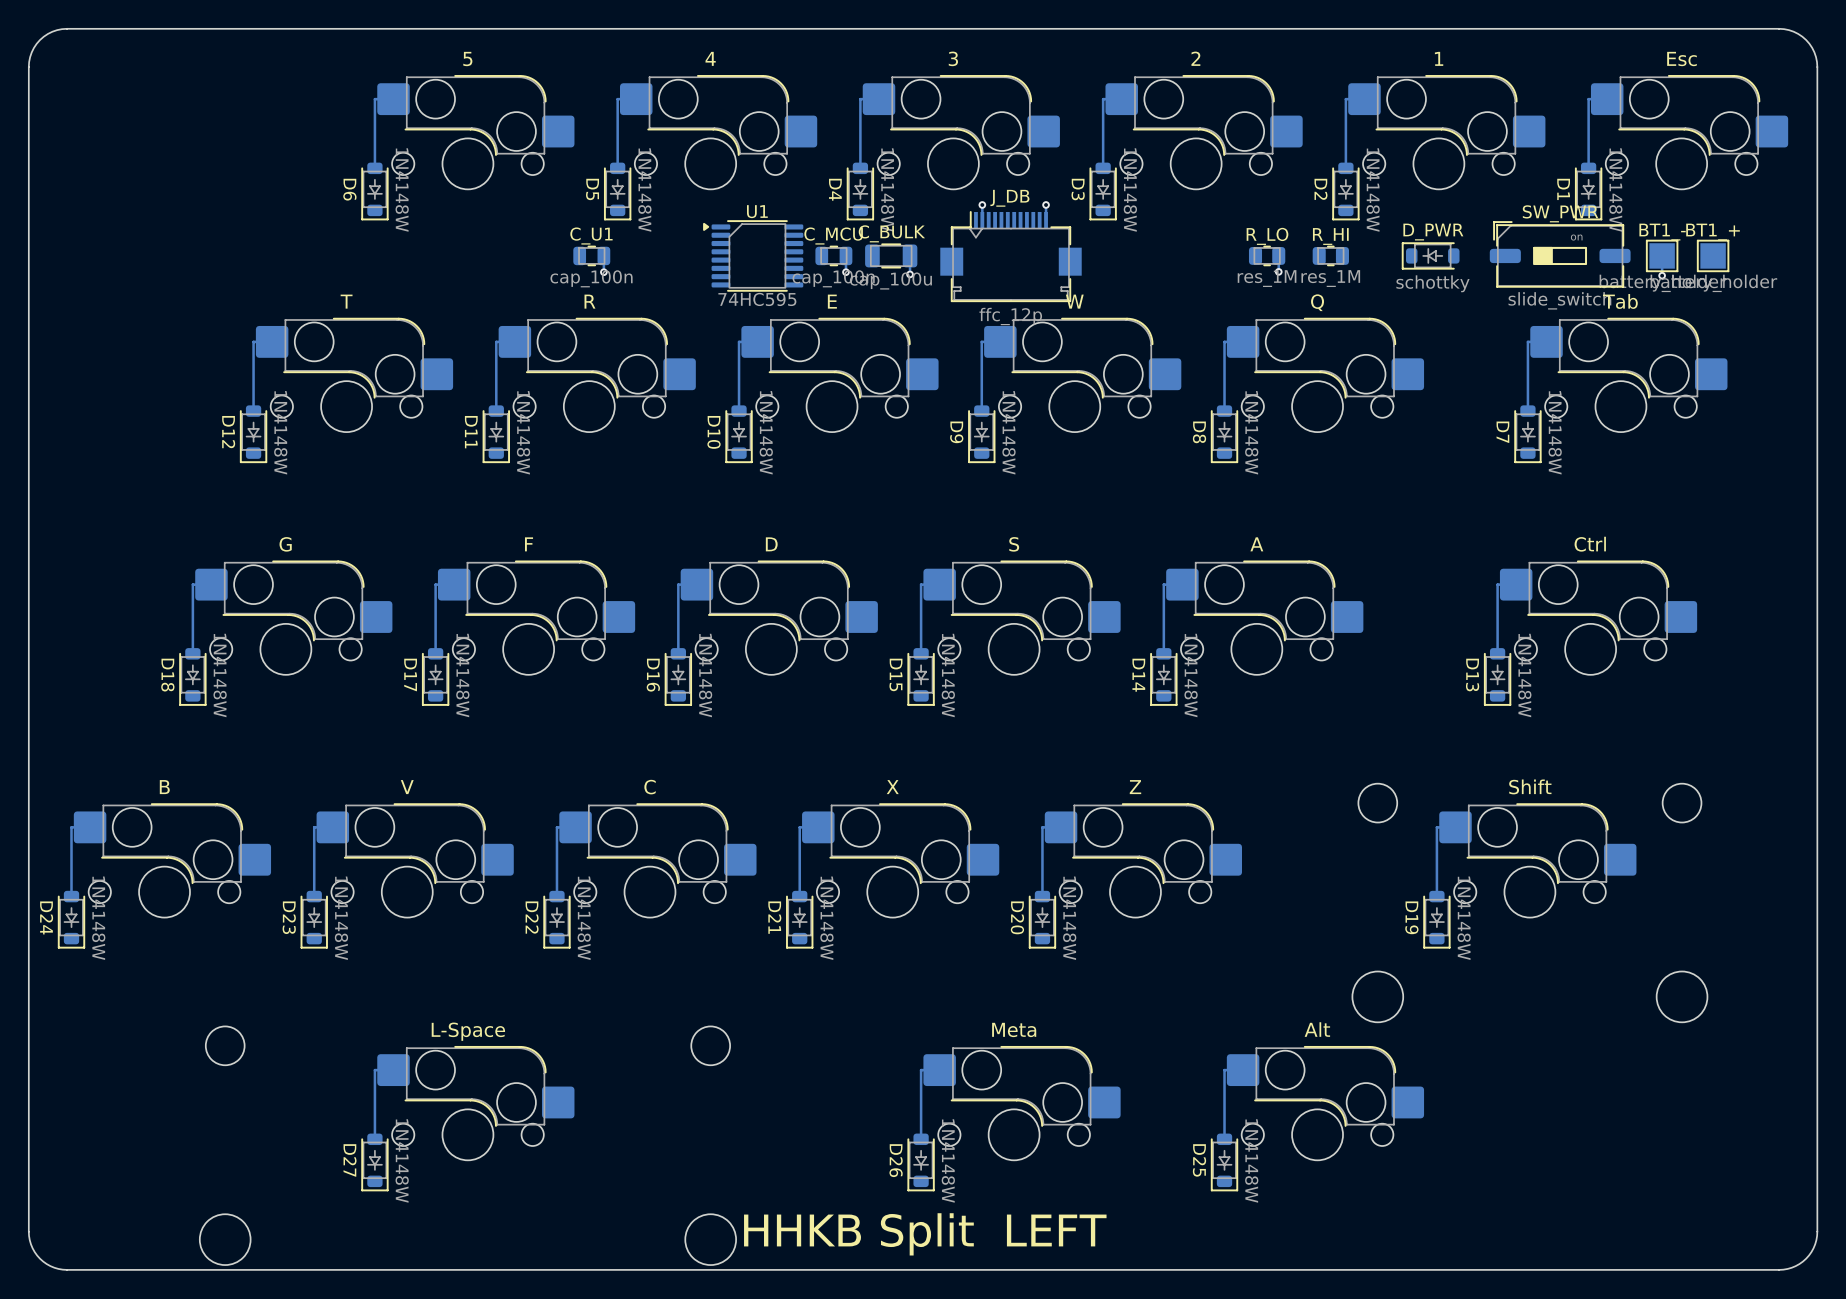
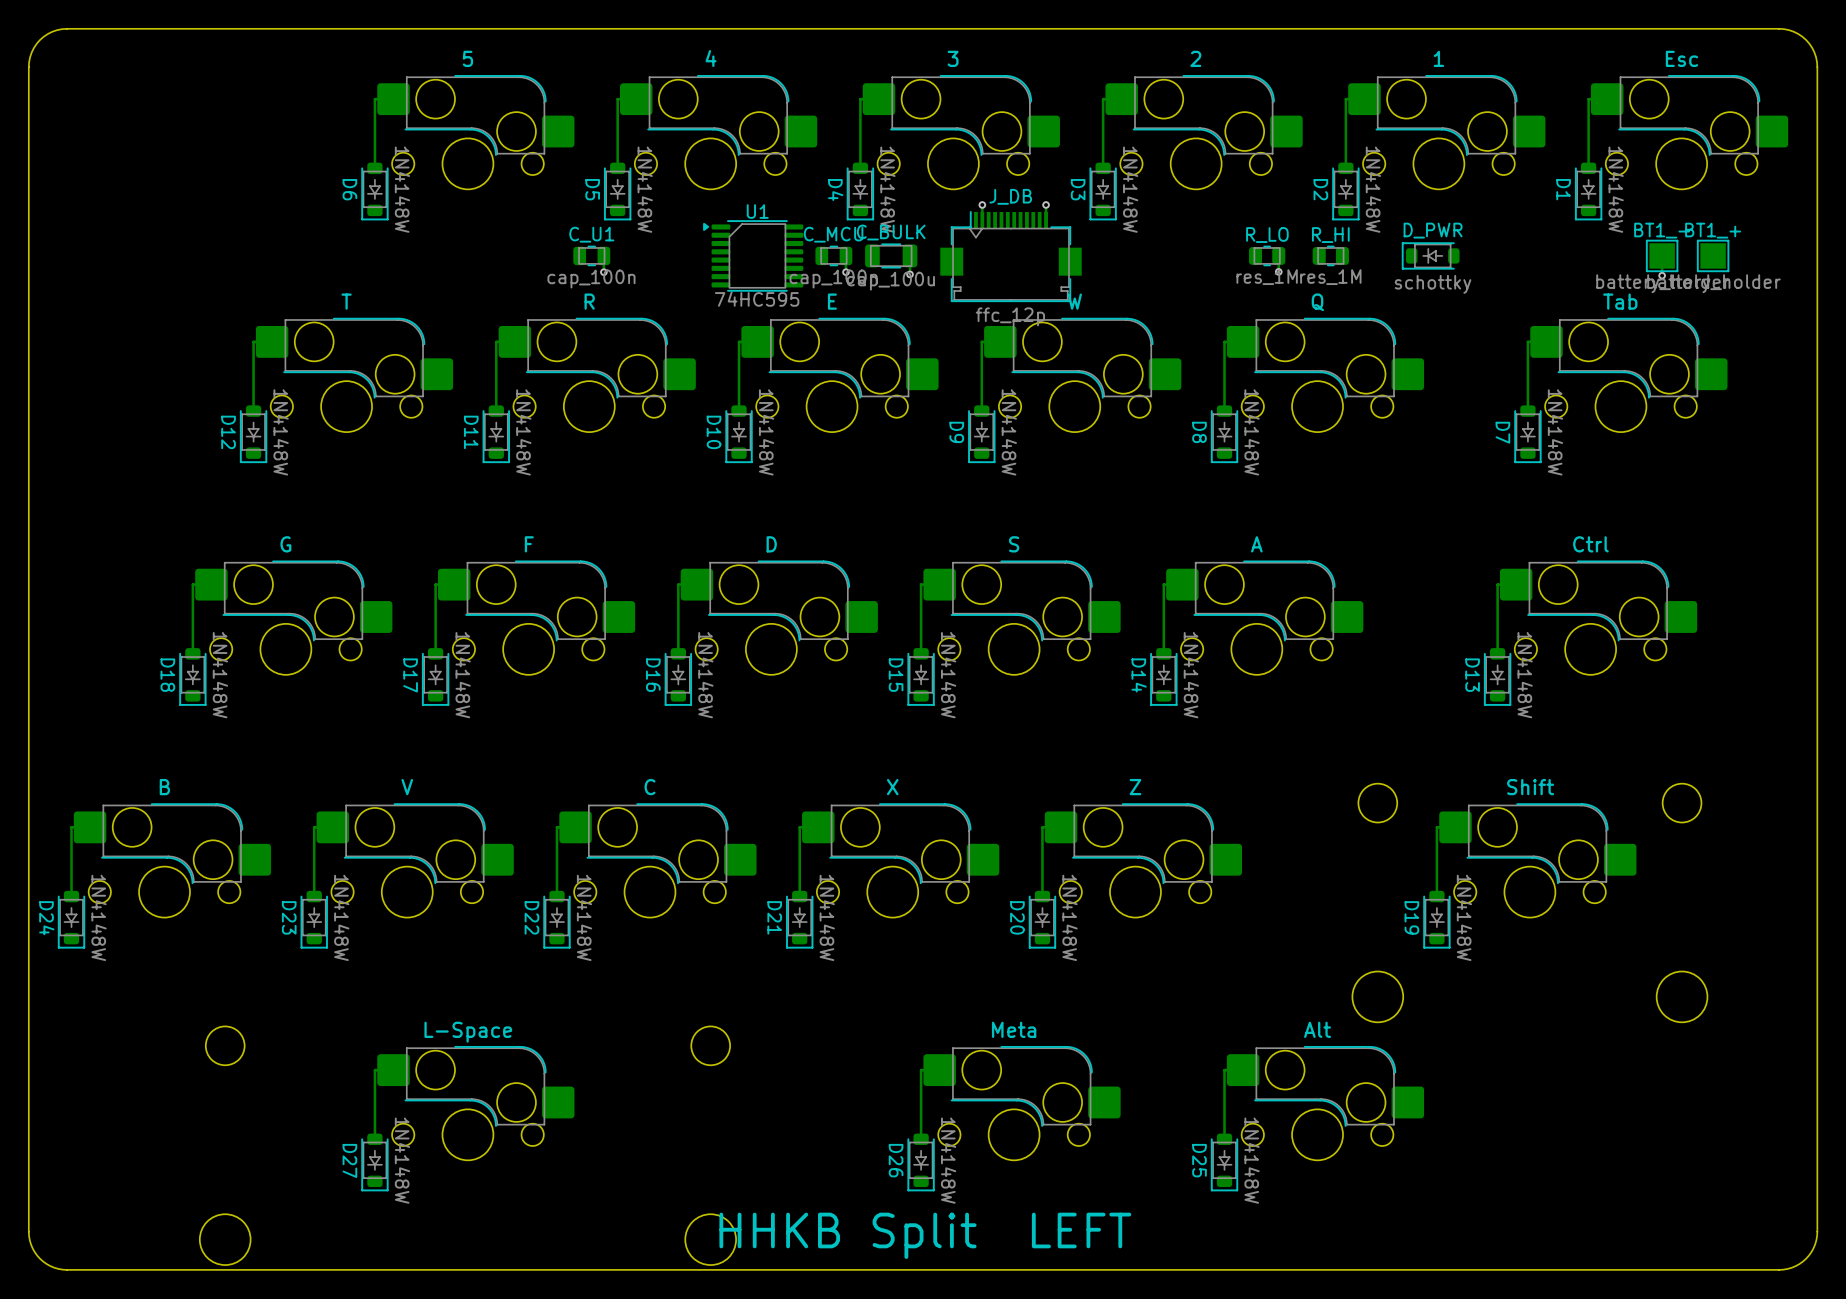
SW_PWR: slide_switch (1560, 254) -> none

